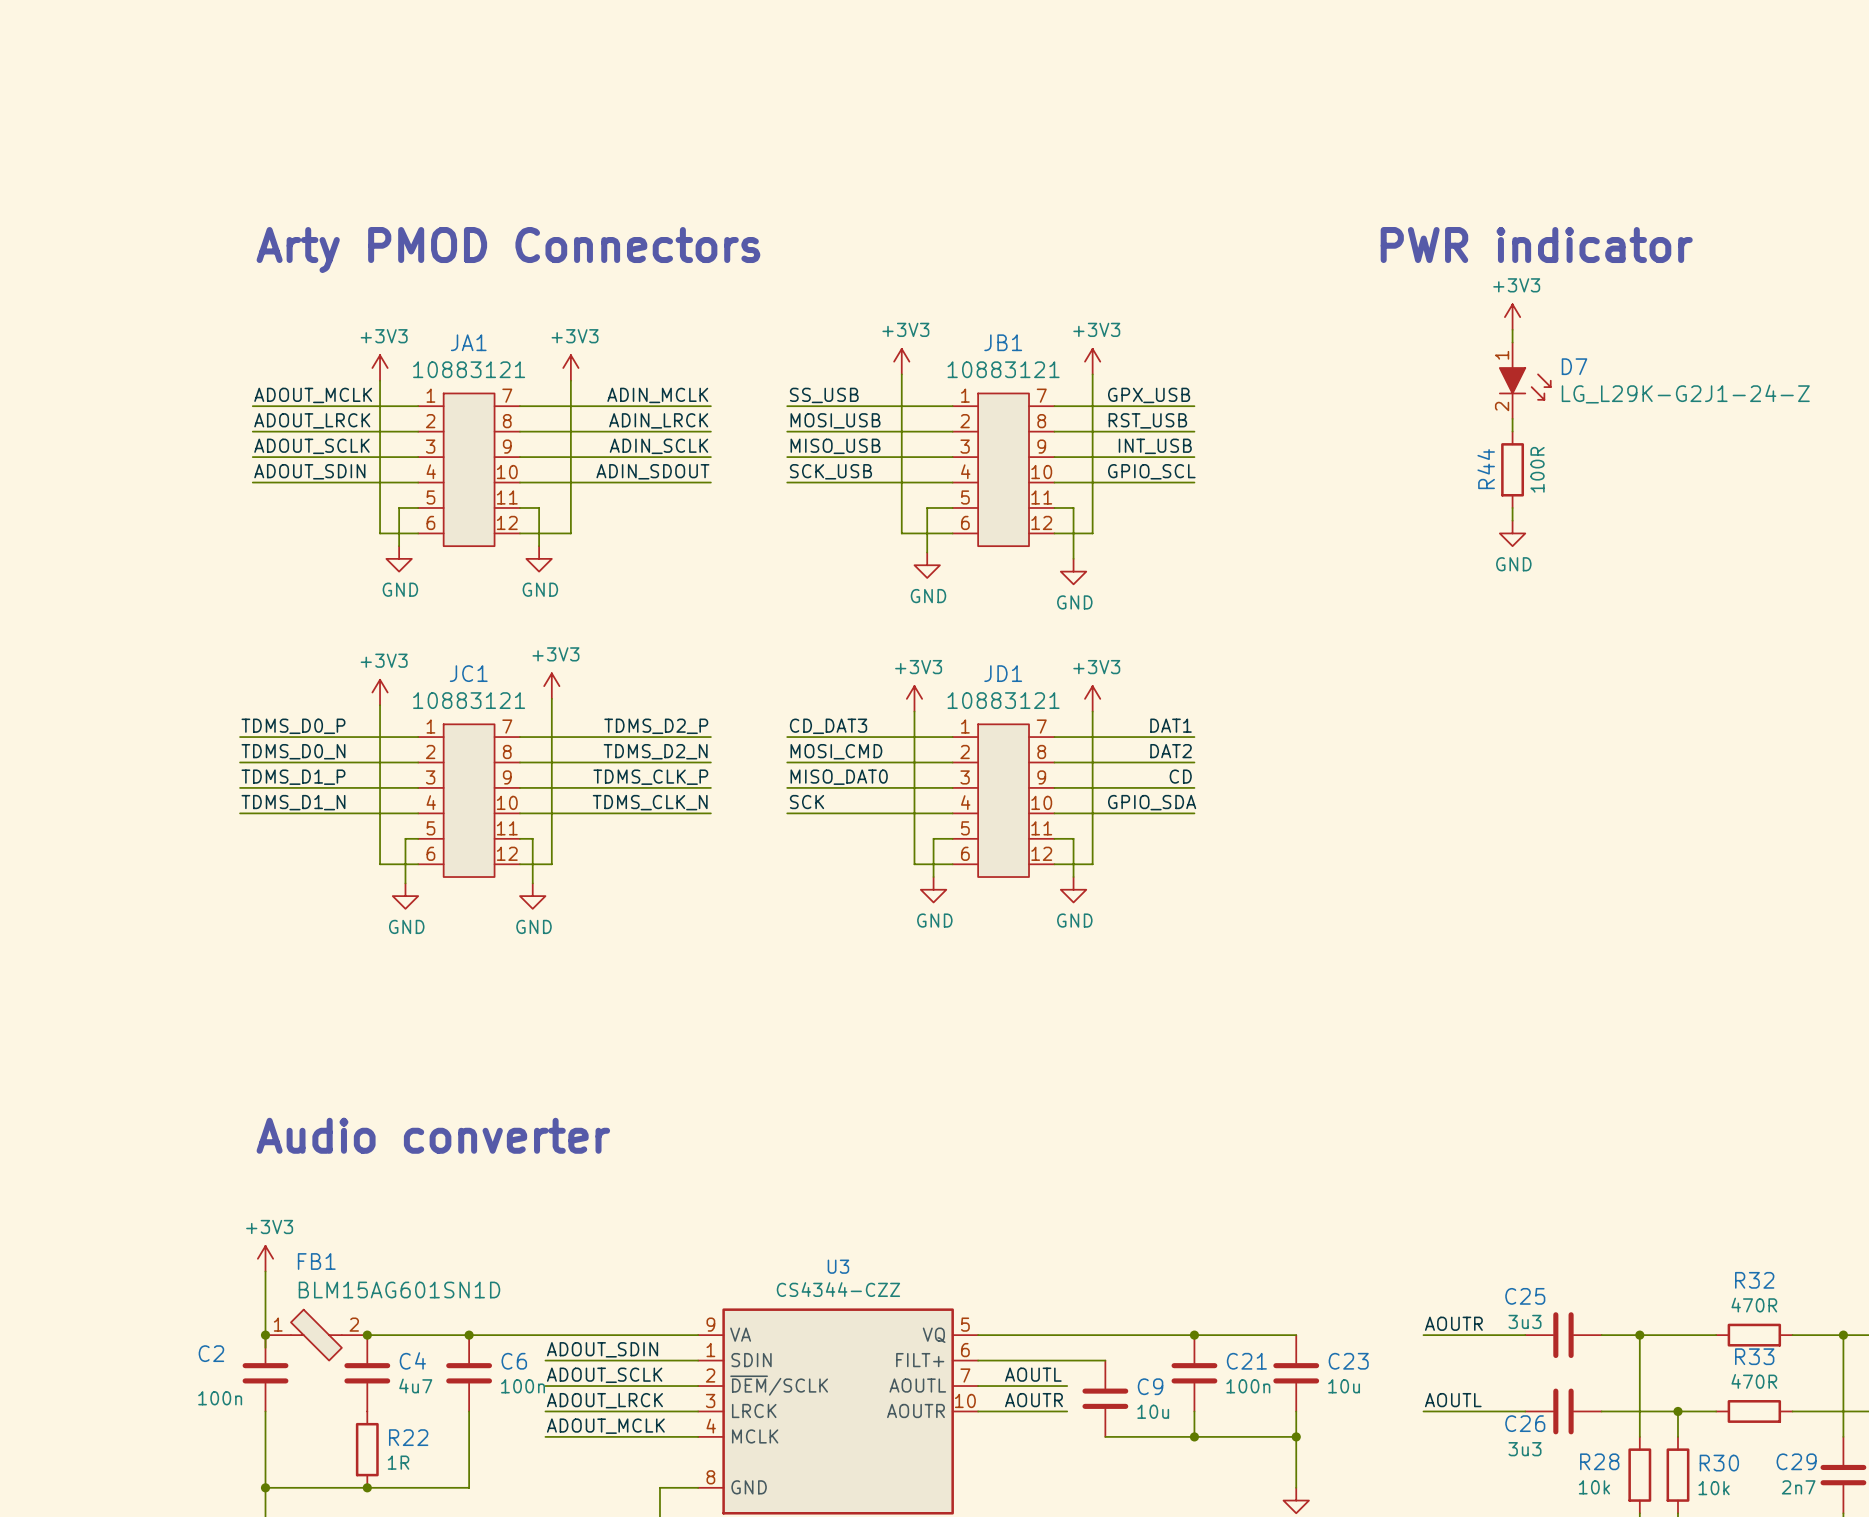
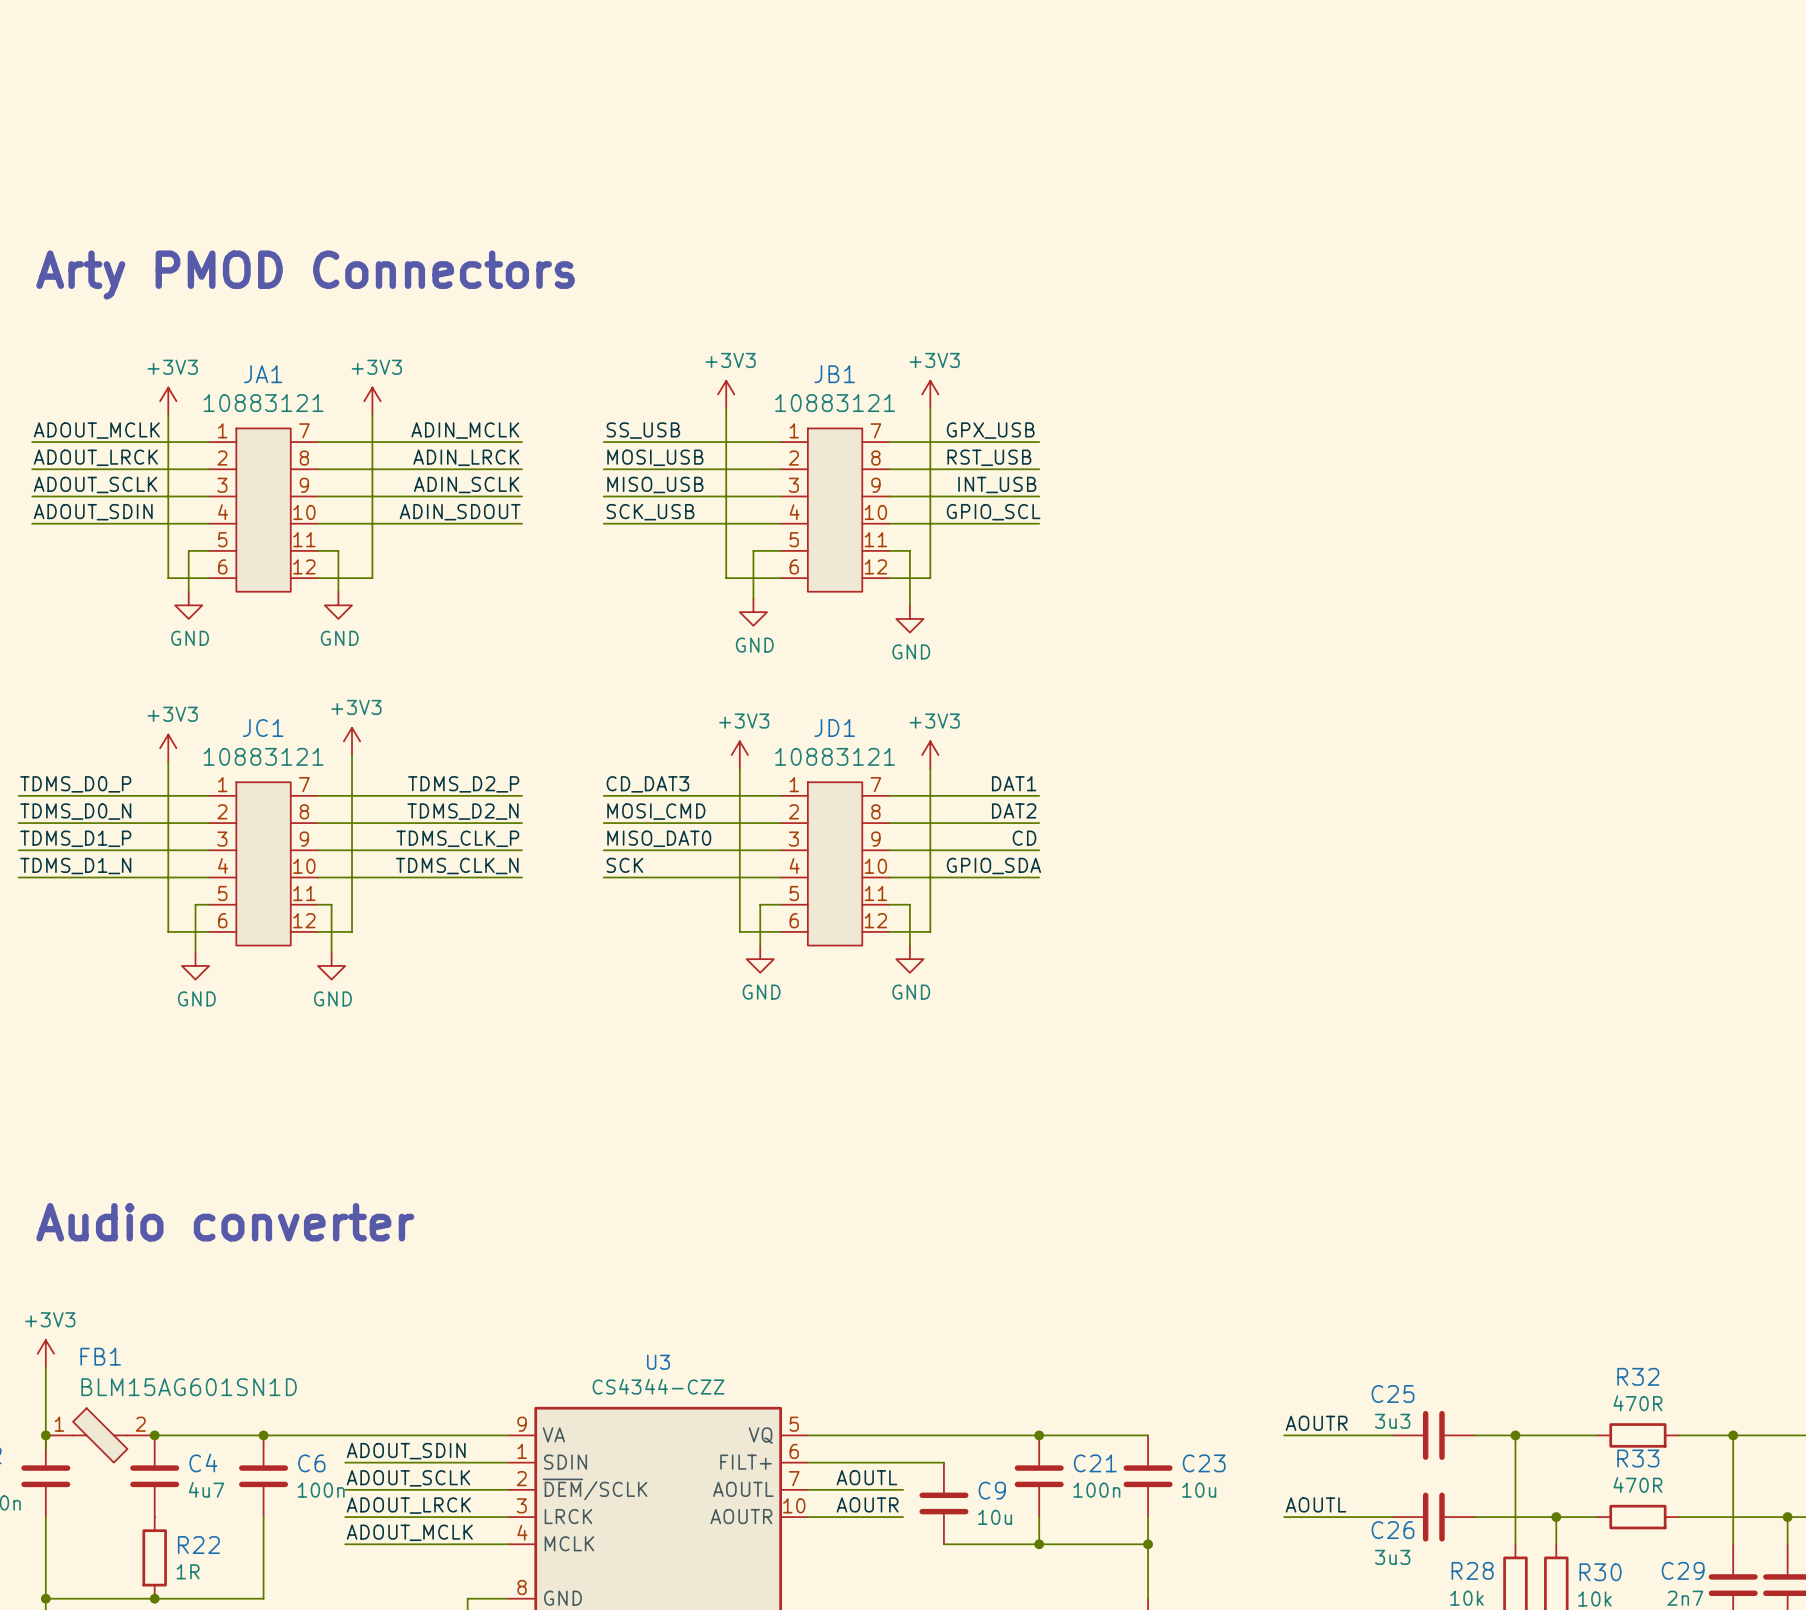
text: PWR indicator (1536, 245) -> none
power symbol: +3V3 (1512, 317) -> none
wire: (1512, 329) (1512, 342) -> none
D7: LG_L29K-G2J1-24-Z (1525, 380) -> none
wire: (1512, 418) (1512, 431) -> none
R44: (1512, 469) -> none
wire: (1512, 507) (1512, 520) -> none
power symbol: GND (1512, 533) -> none

